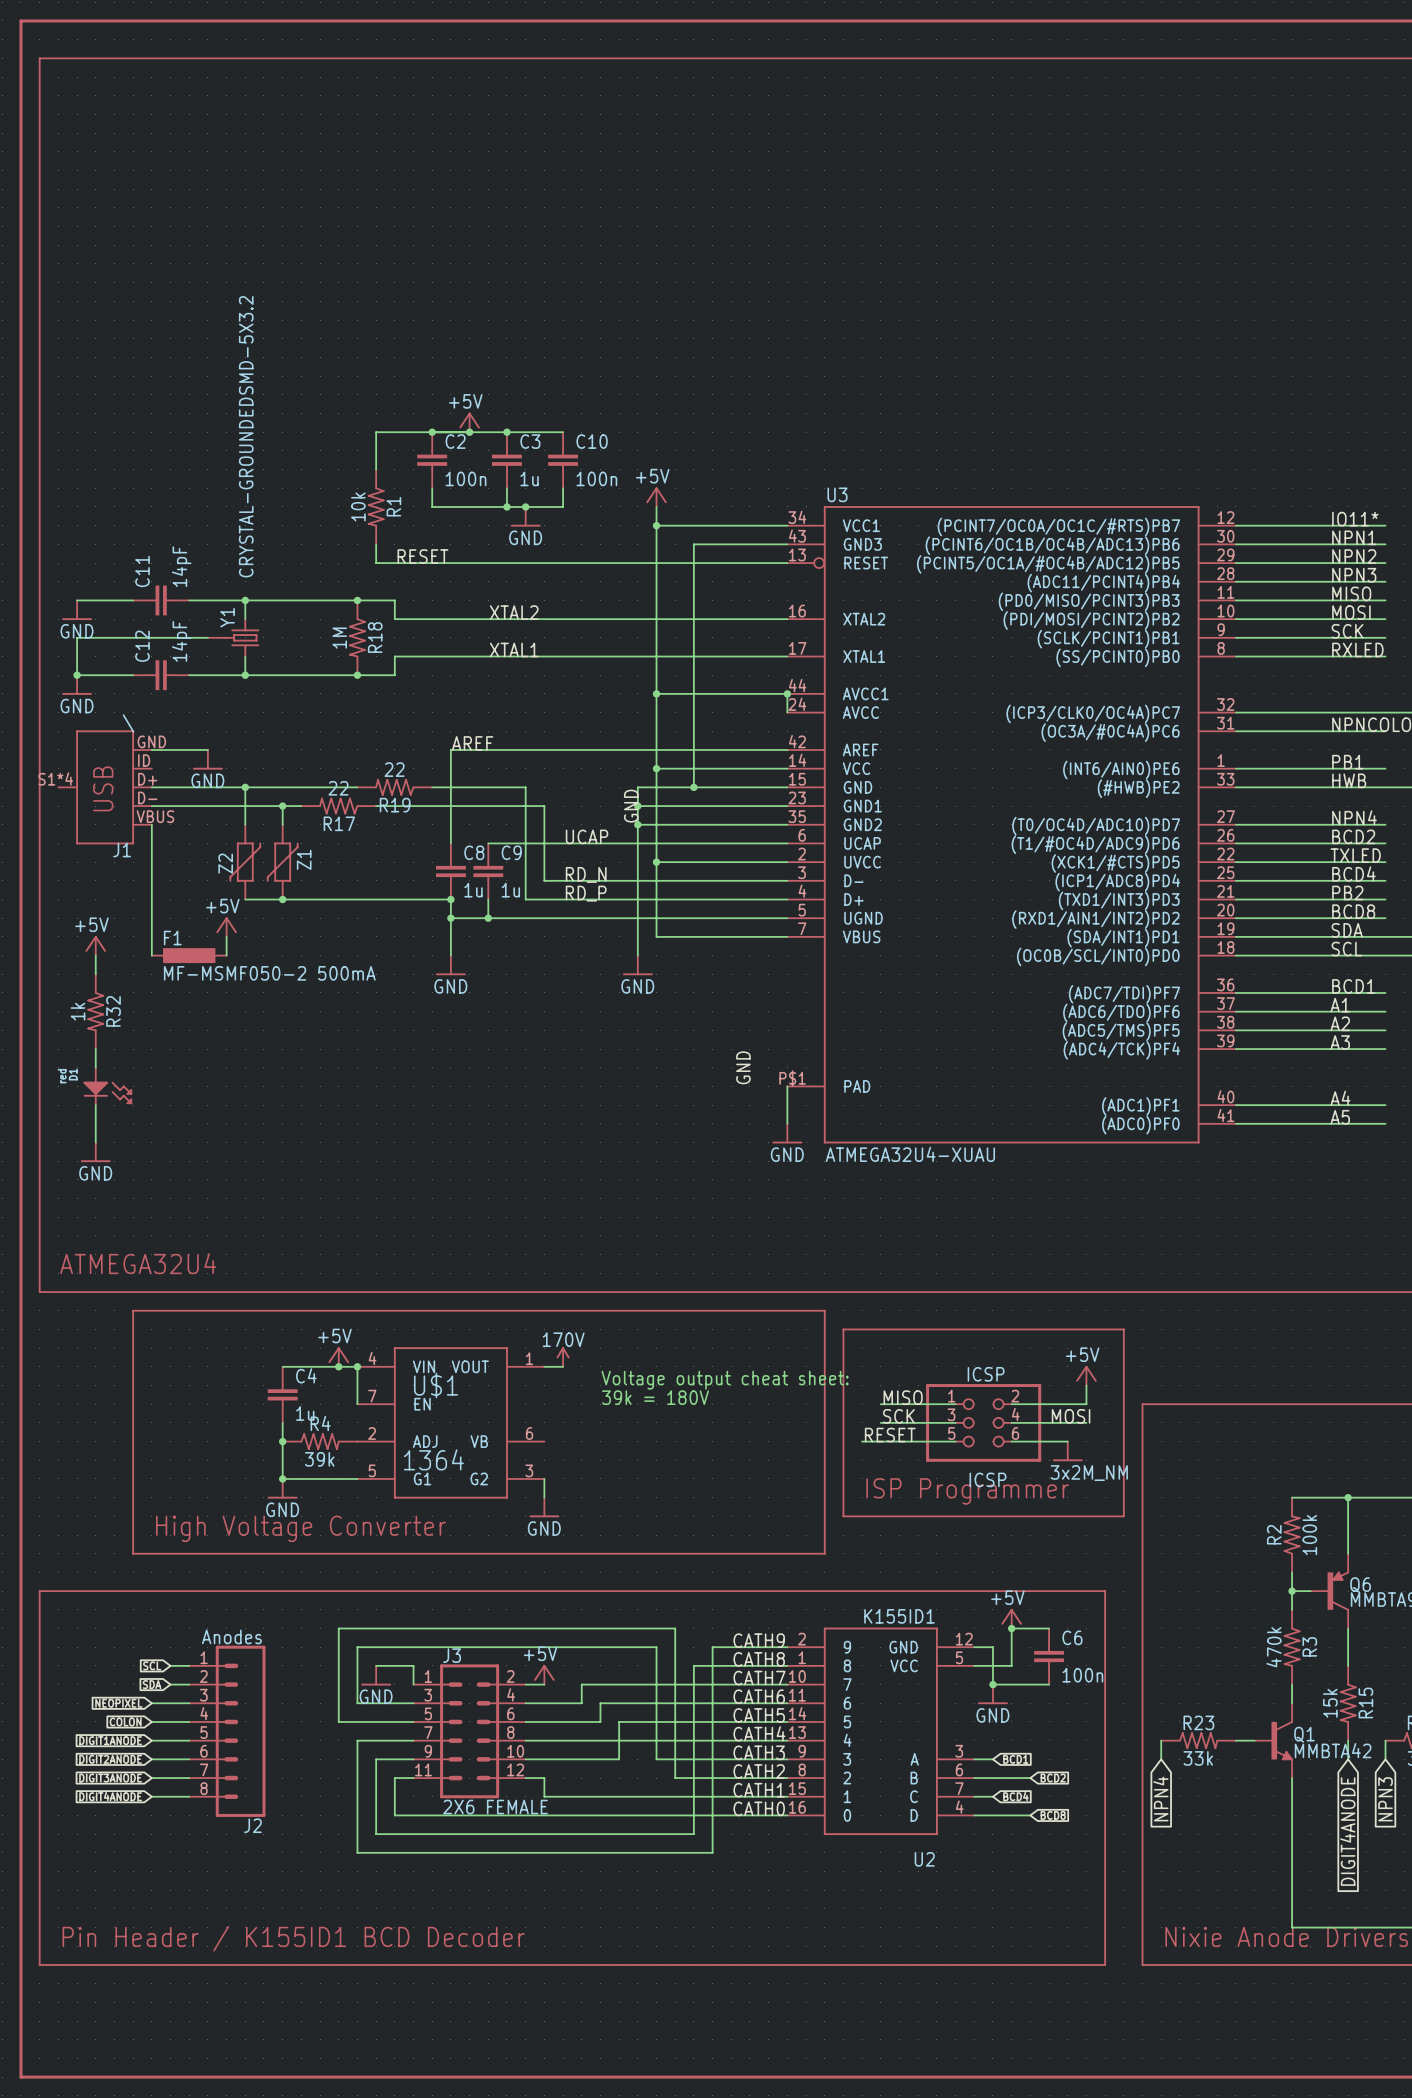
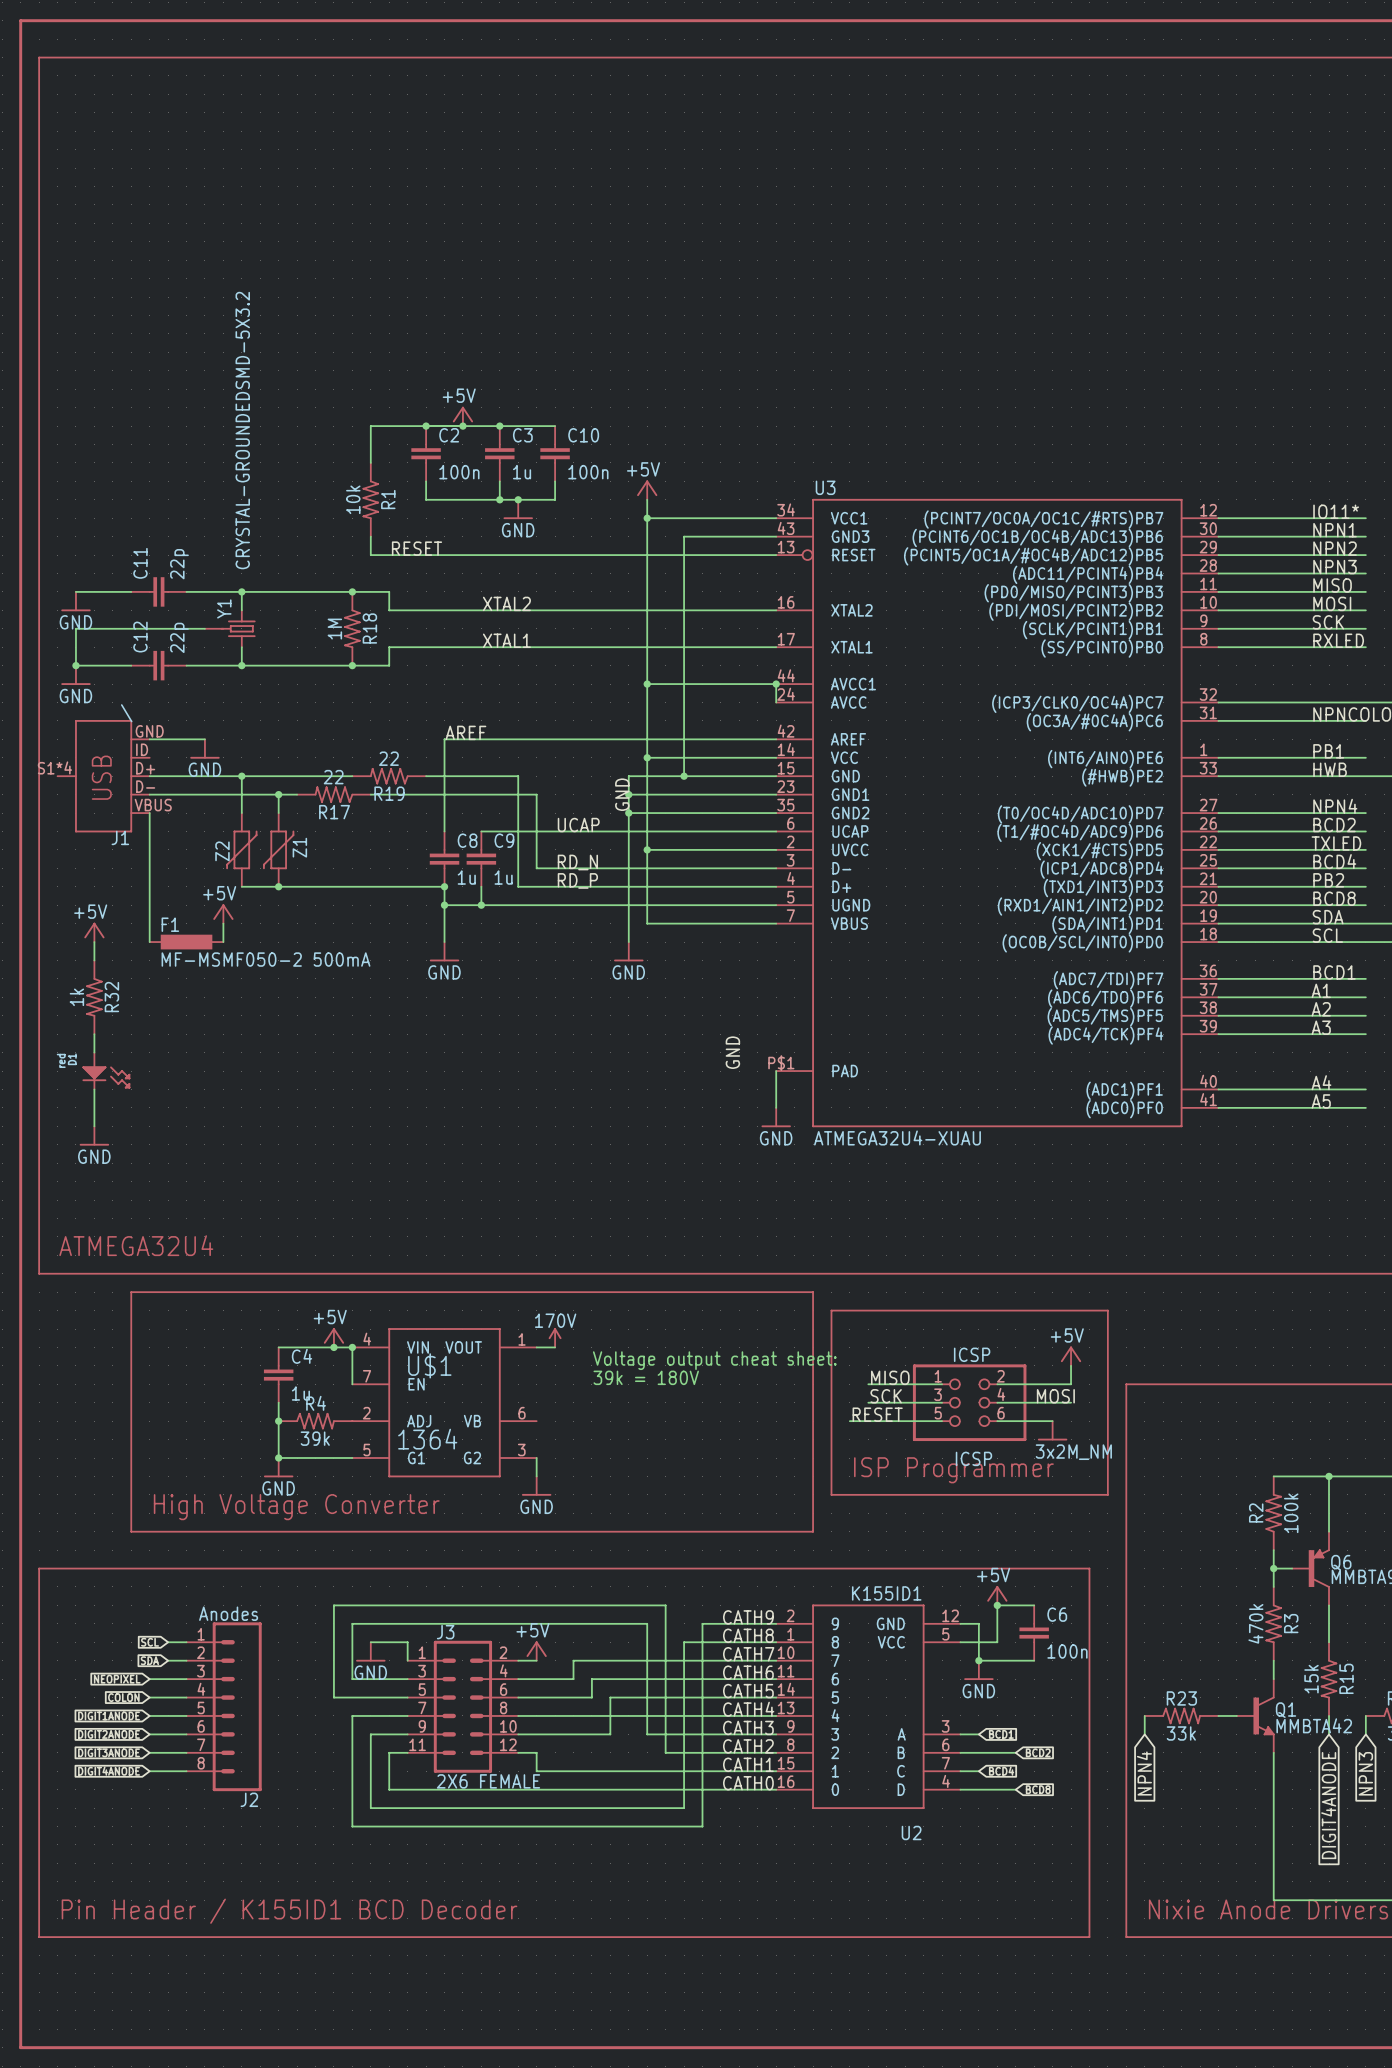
C11 value: 14pF (181, 566) -> 22p (179, 564)
C12 value: 14pF (181, 641) -> 22p (179, 637)

